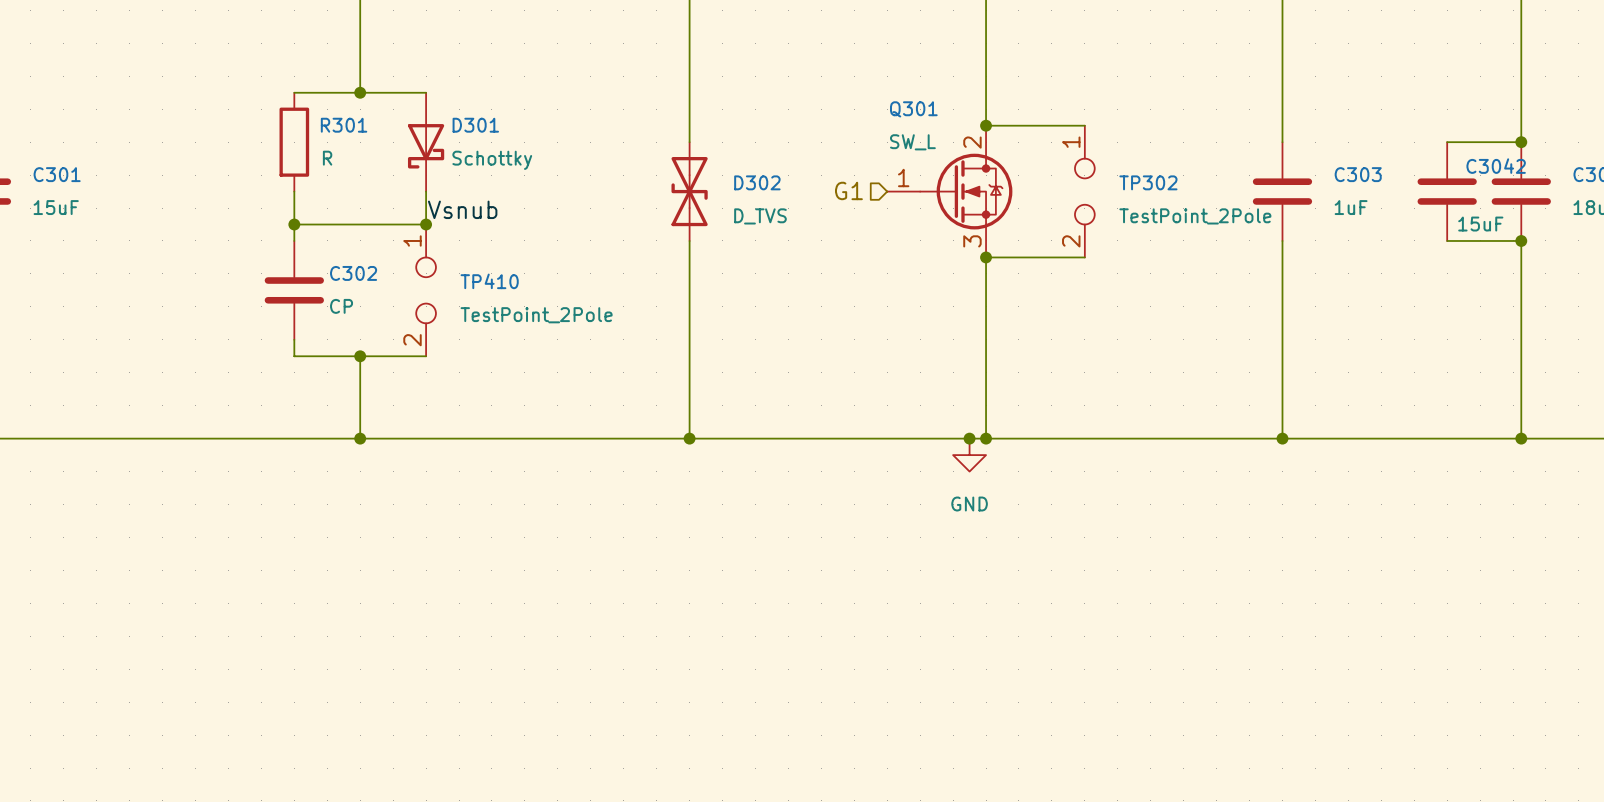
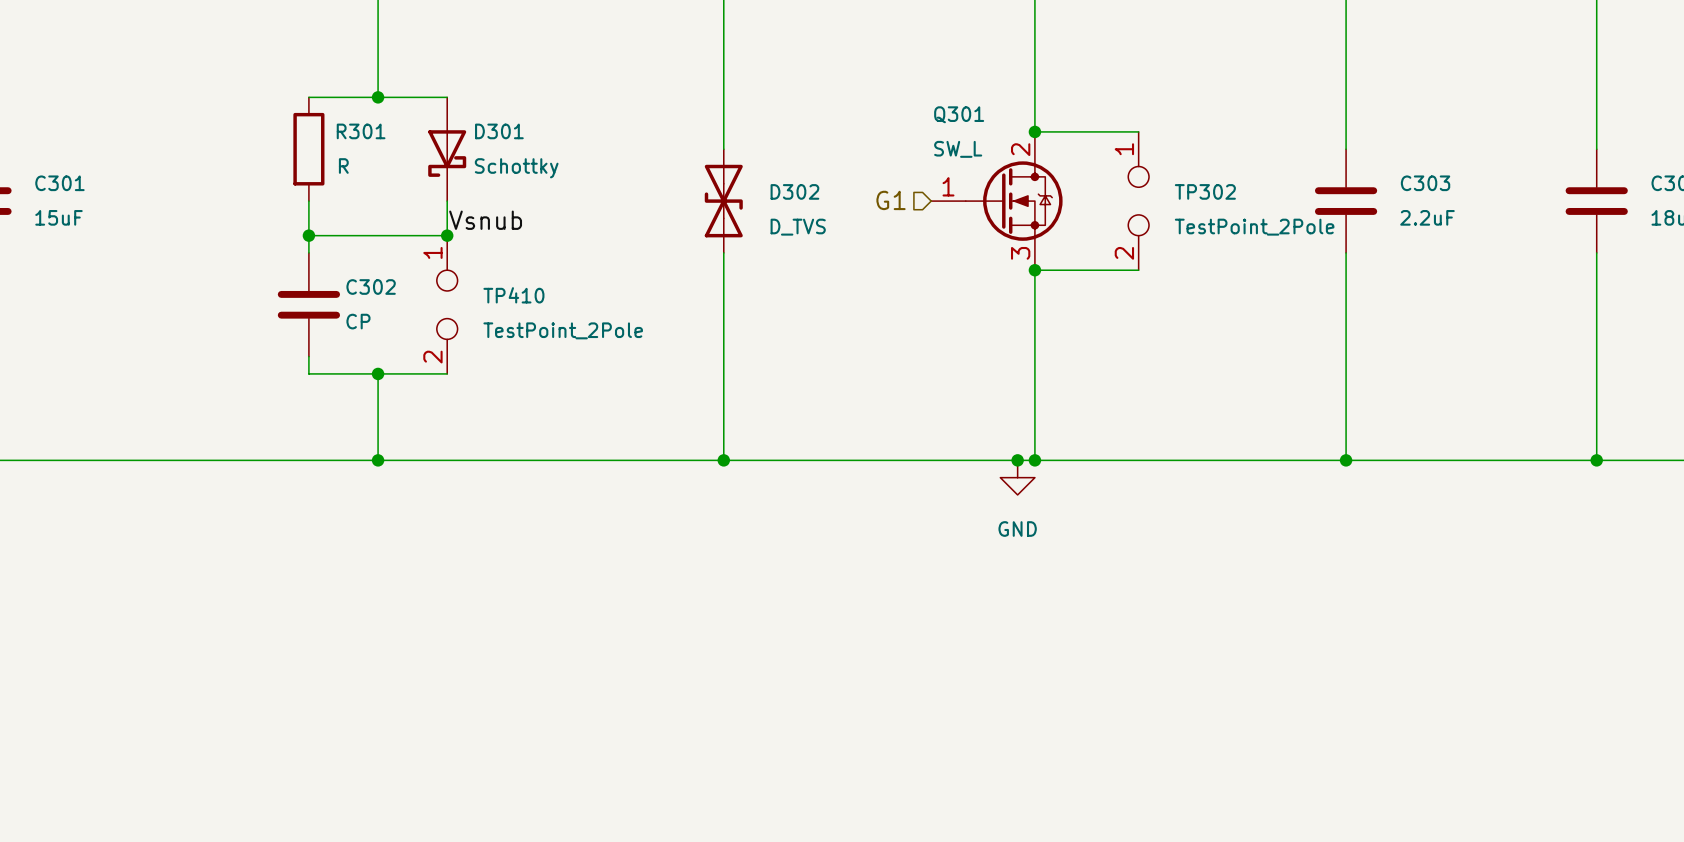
wire: (1447, 142) (1521, 142) -> none
junction: (1521, 142) -> none
C3042: 15uF (1447, 191) -> none
C303 value: 1uF (1351, 207) -> 2.2uF (1427, 217)
wire: (1447, 240) (1521, 240) -> none
junction: (1521, 240) -> none

